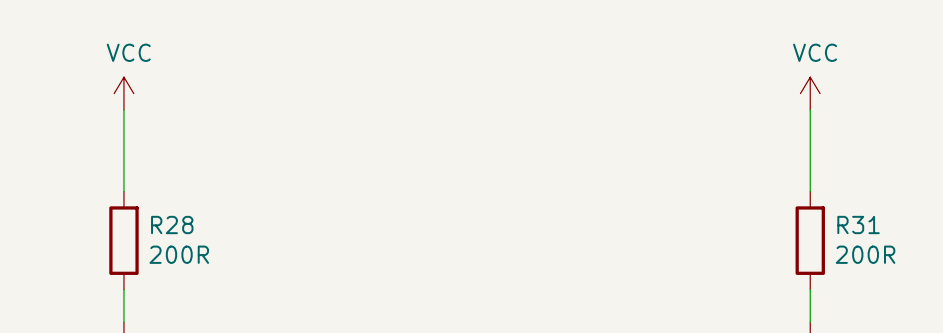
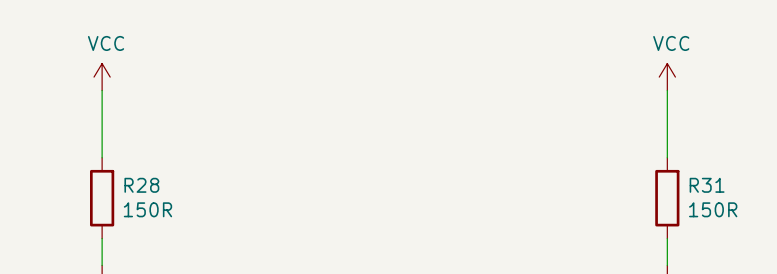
R28 value: 200R (179, 254) -> 150R (147, 209)
R31 value: 200R (865, 254) -> 150R (713, 209)

